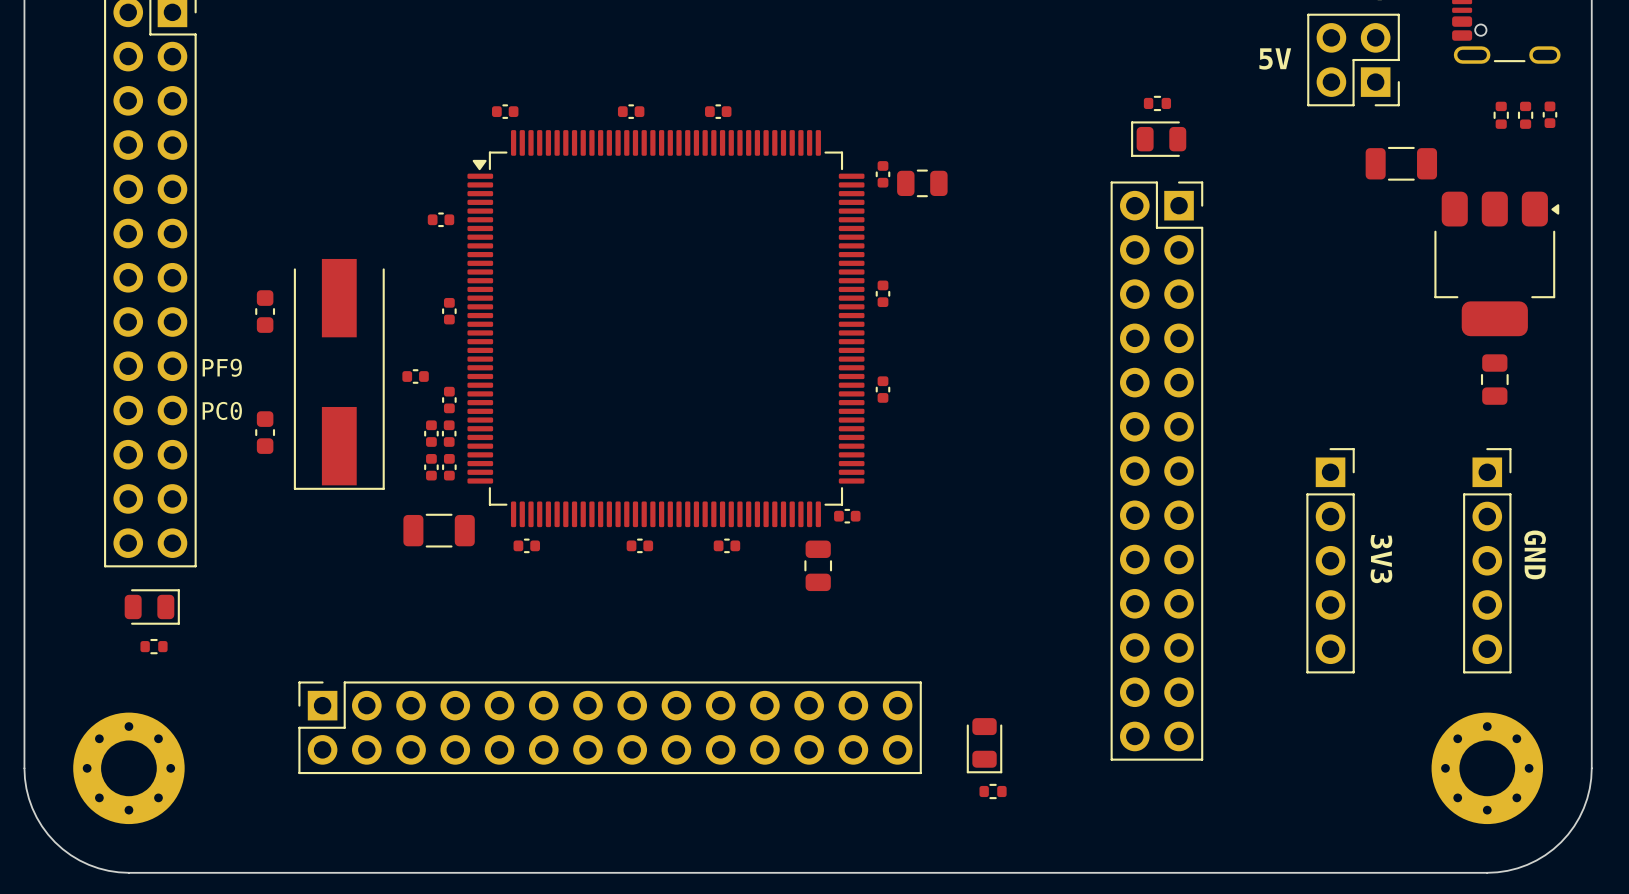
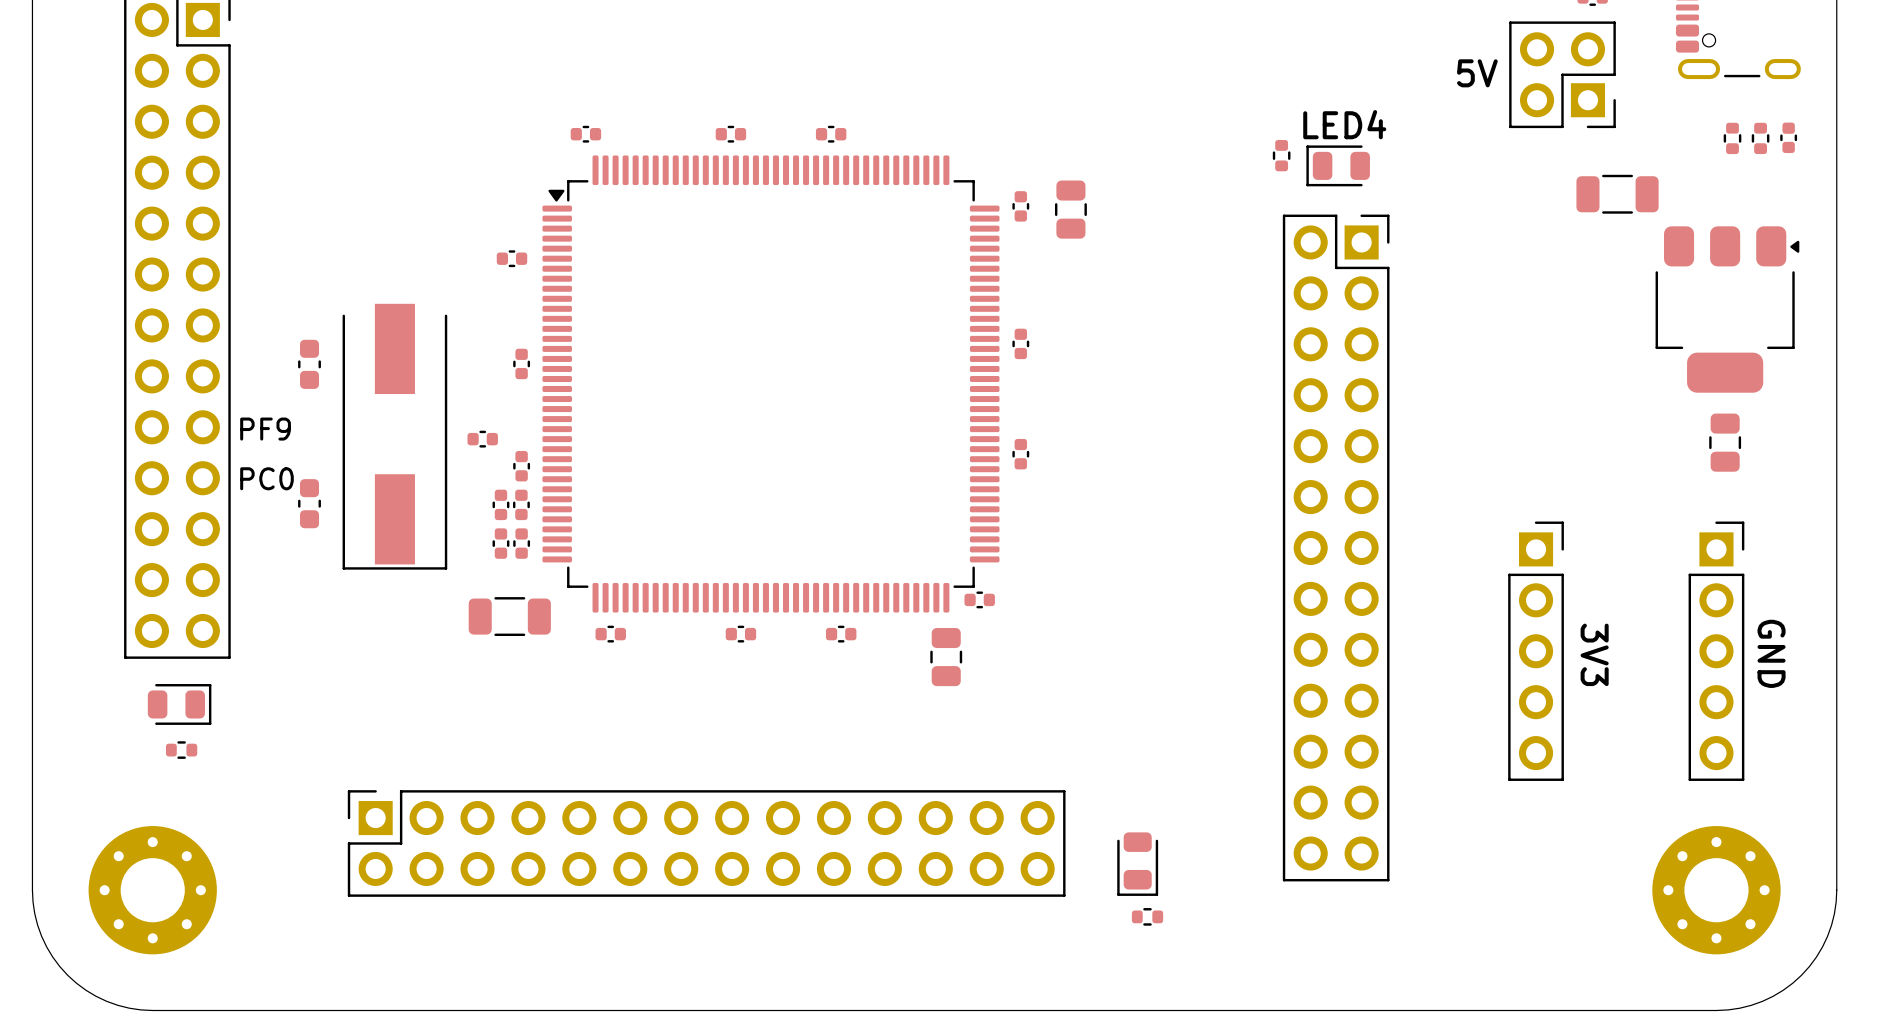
part rotation: 0° (1157, 103) -> 90° clockwise (1281, 155)
part position: (1157, 103) -> (1281, 155)
text: none -> LED4 (1344, 124)
part rotation: 0° (922, 183) -> 90° clockwise (1070, 209)

